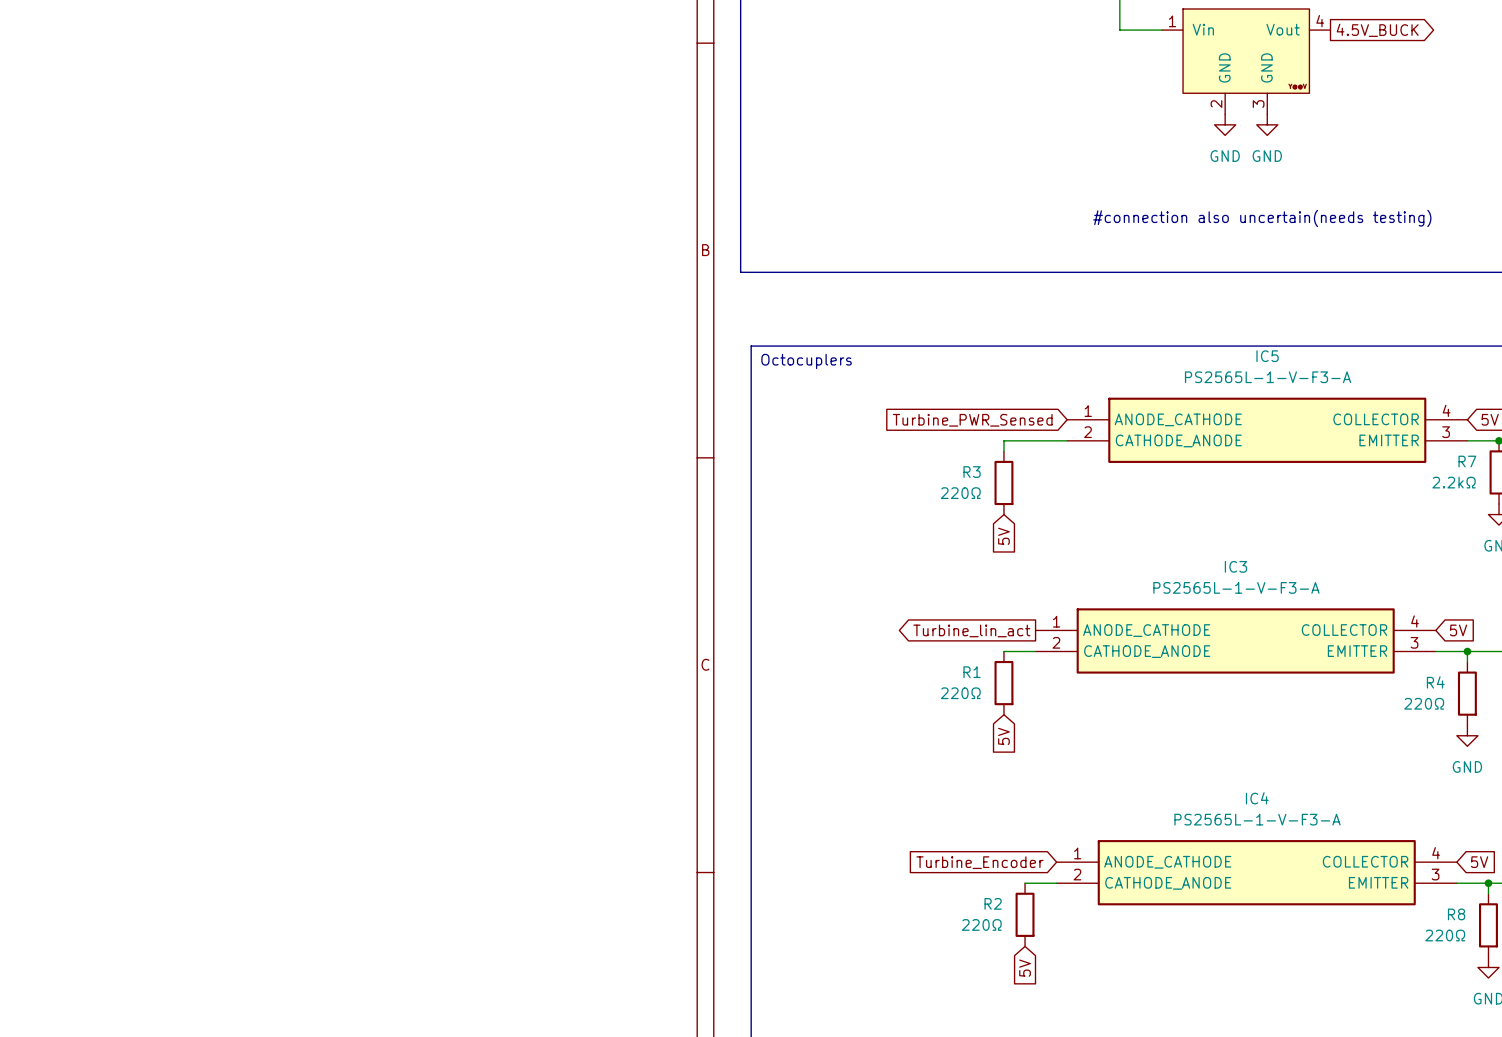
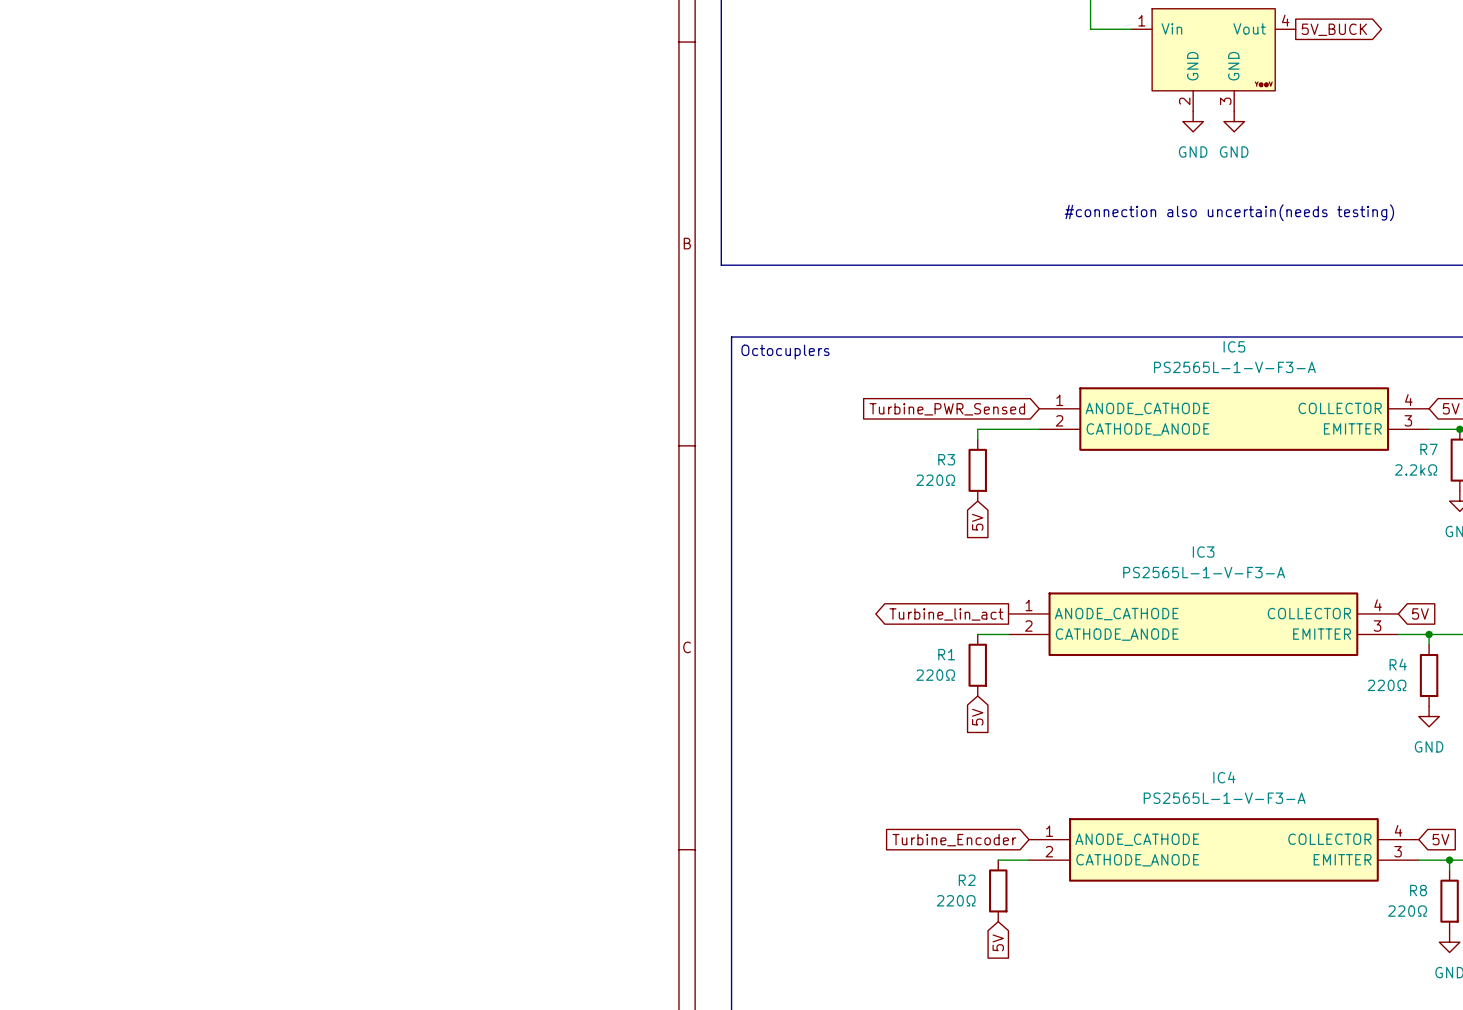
global label: 4.5V_BUCK (1377, 30) -> 5V_BUCK (1334, 29)

